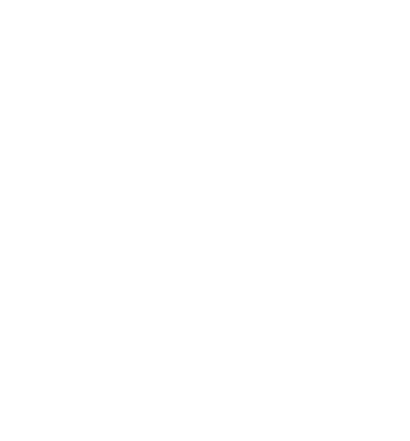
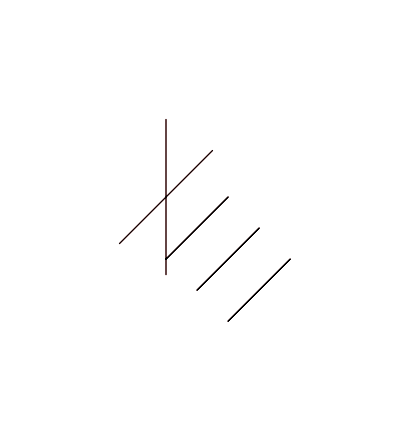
board edge: none -> (165, 119) (165, 274)
top track: none -> (165, 119) (165, 274)
board edge: none -> (212, 150) (119, 243)
board edge: none -> (228, 197) (165, 259) (228, 197)
board edge: none -> (259, 228) (197, 290) (259, 228)
board edge: none -> (290, 259) (228, 321) (290, 259)

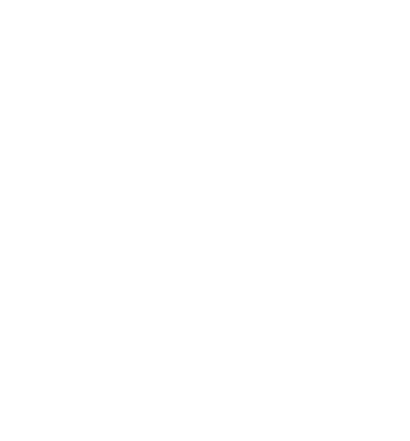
board edge: (165, 119) (165, 274) -> none
top track: (165, 119) (165, 274) -> none
board edge: (212, 150) (119, 243) -> none
board edge: (228, 197) (165, 259) (228, 197) -> none
board edge: (259, 228) (197, 290) (259, 228) -> none
board edge: (290, 259) (228, 321) (290, 259) -> none

